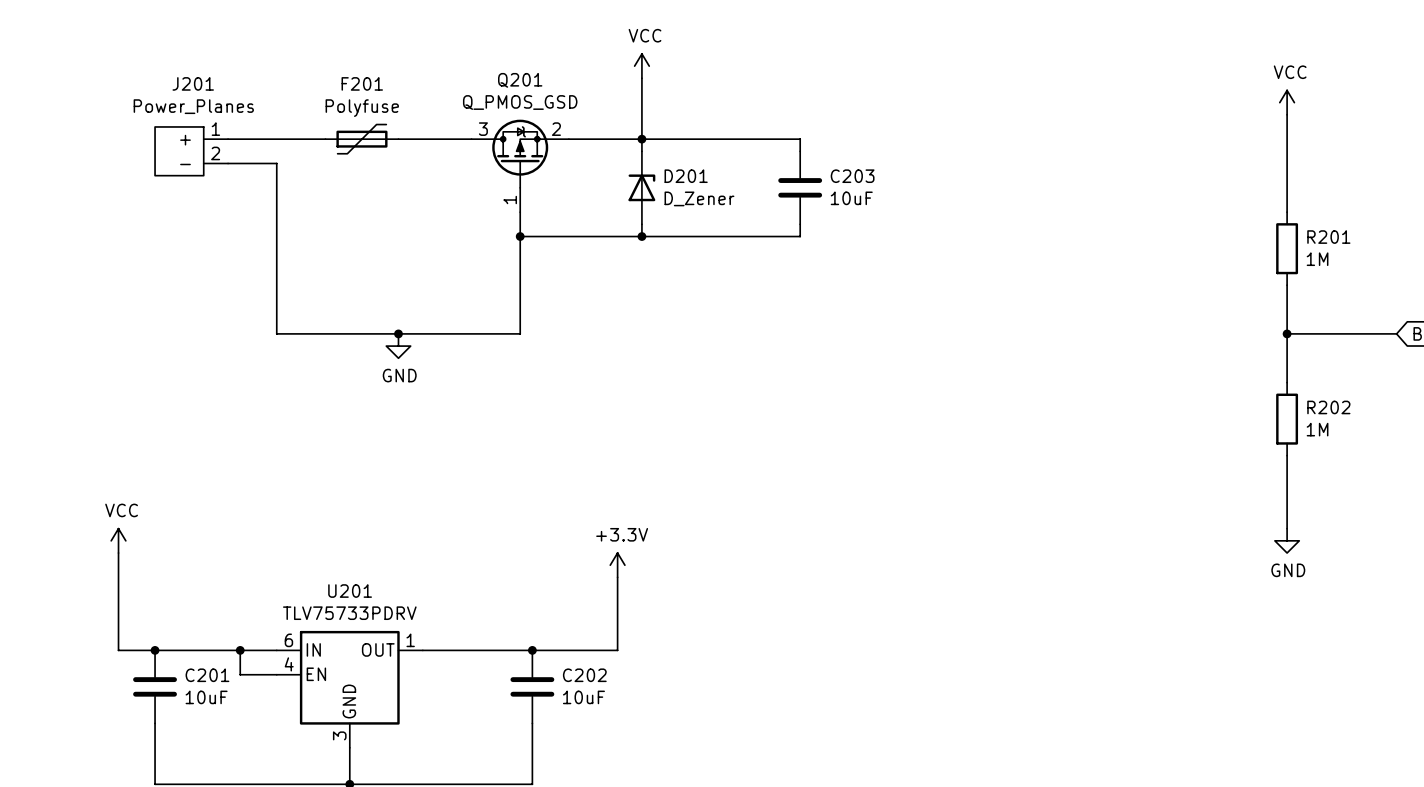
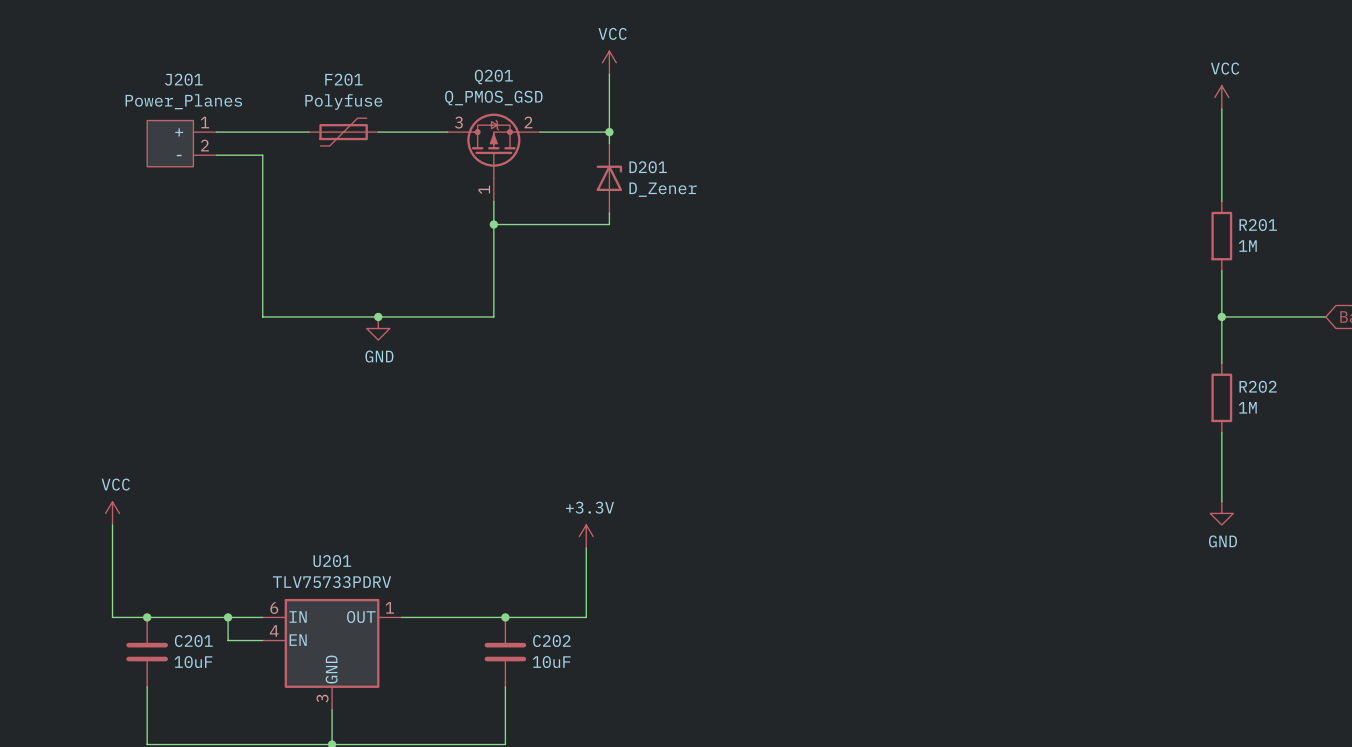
wire: (641, 139) (800, 139) (800, 151) -> none
C203: 10uF (800, 187) -> none
wire: (800, 224) (800, 236) (641, 236) -> none
junction: (641, 236) -> none

